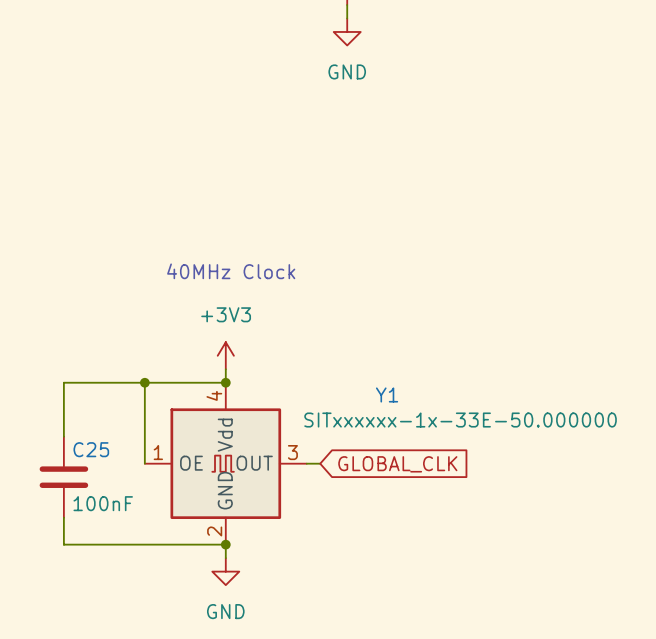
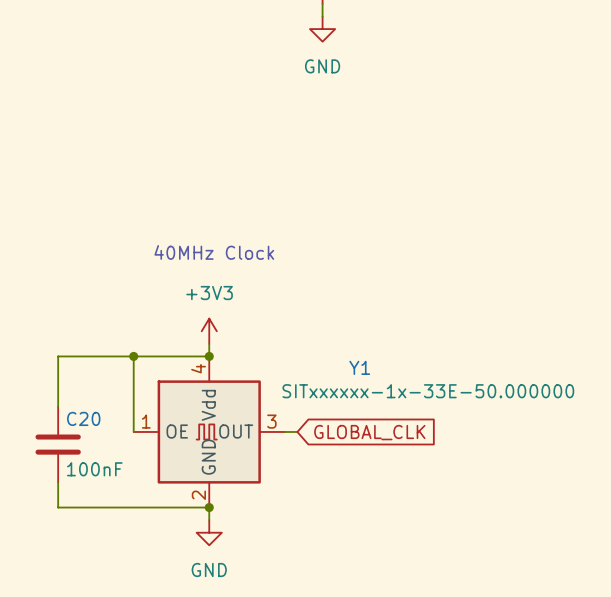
C25 name: C25 (91, 449) -> C20 (83, 418)

